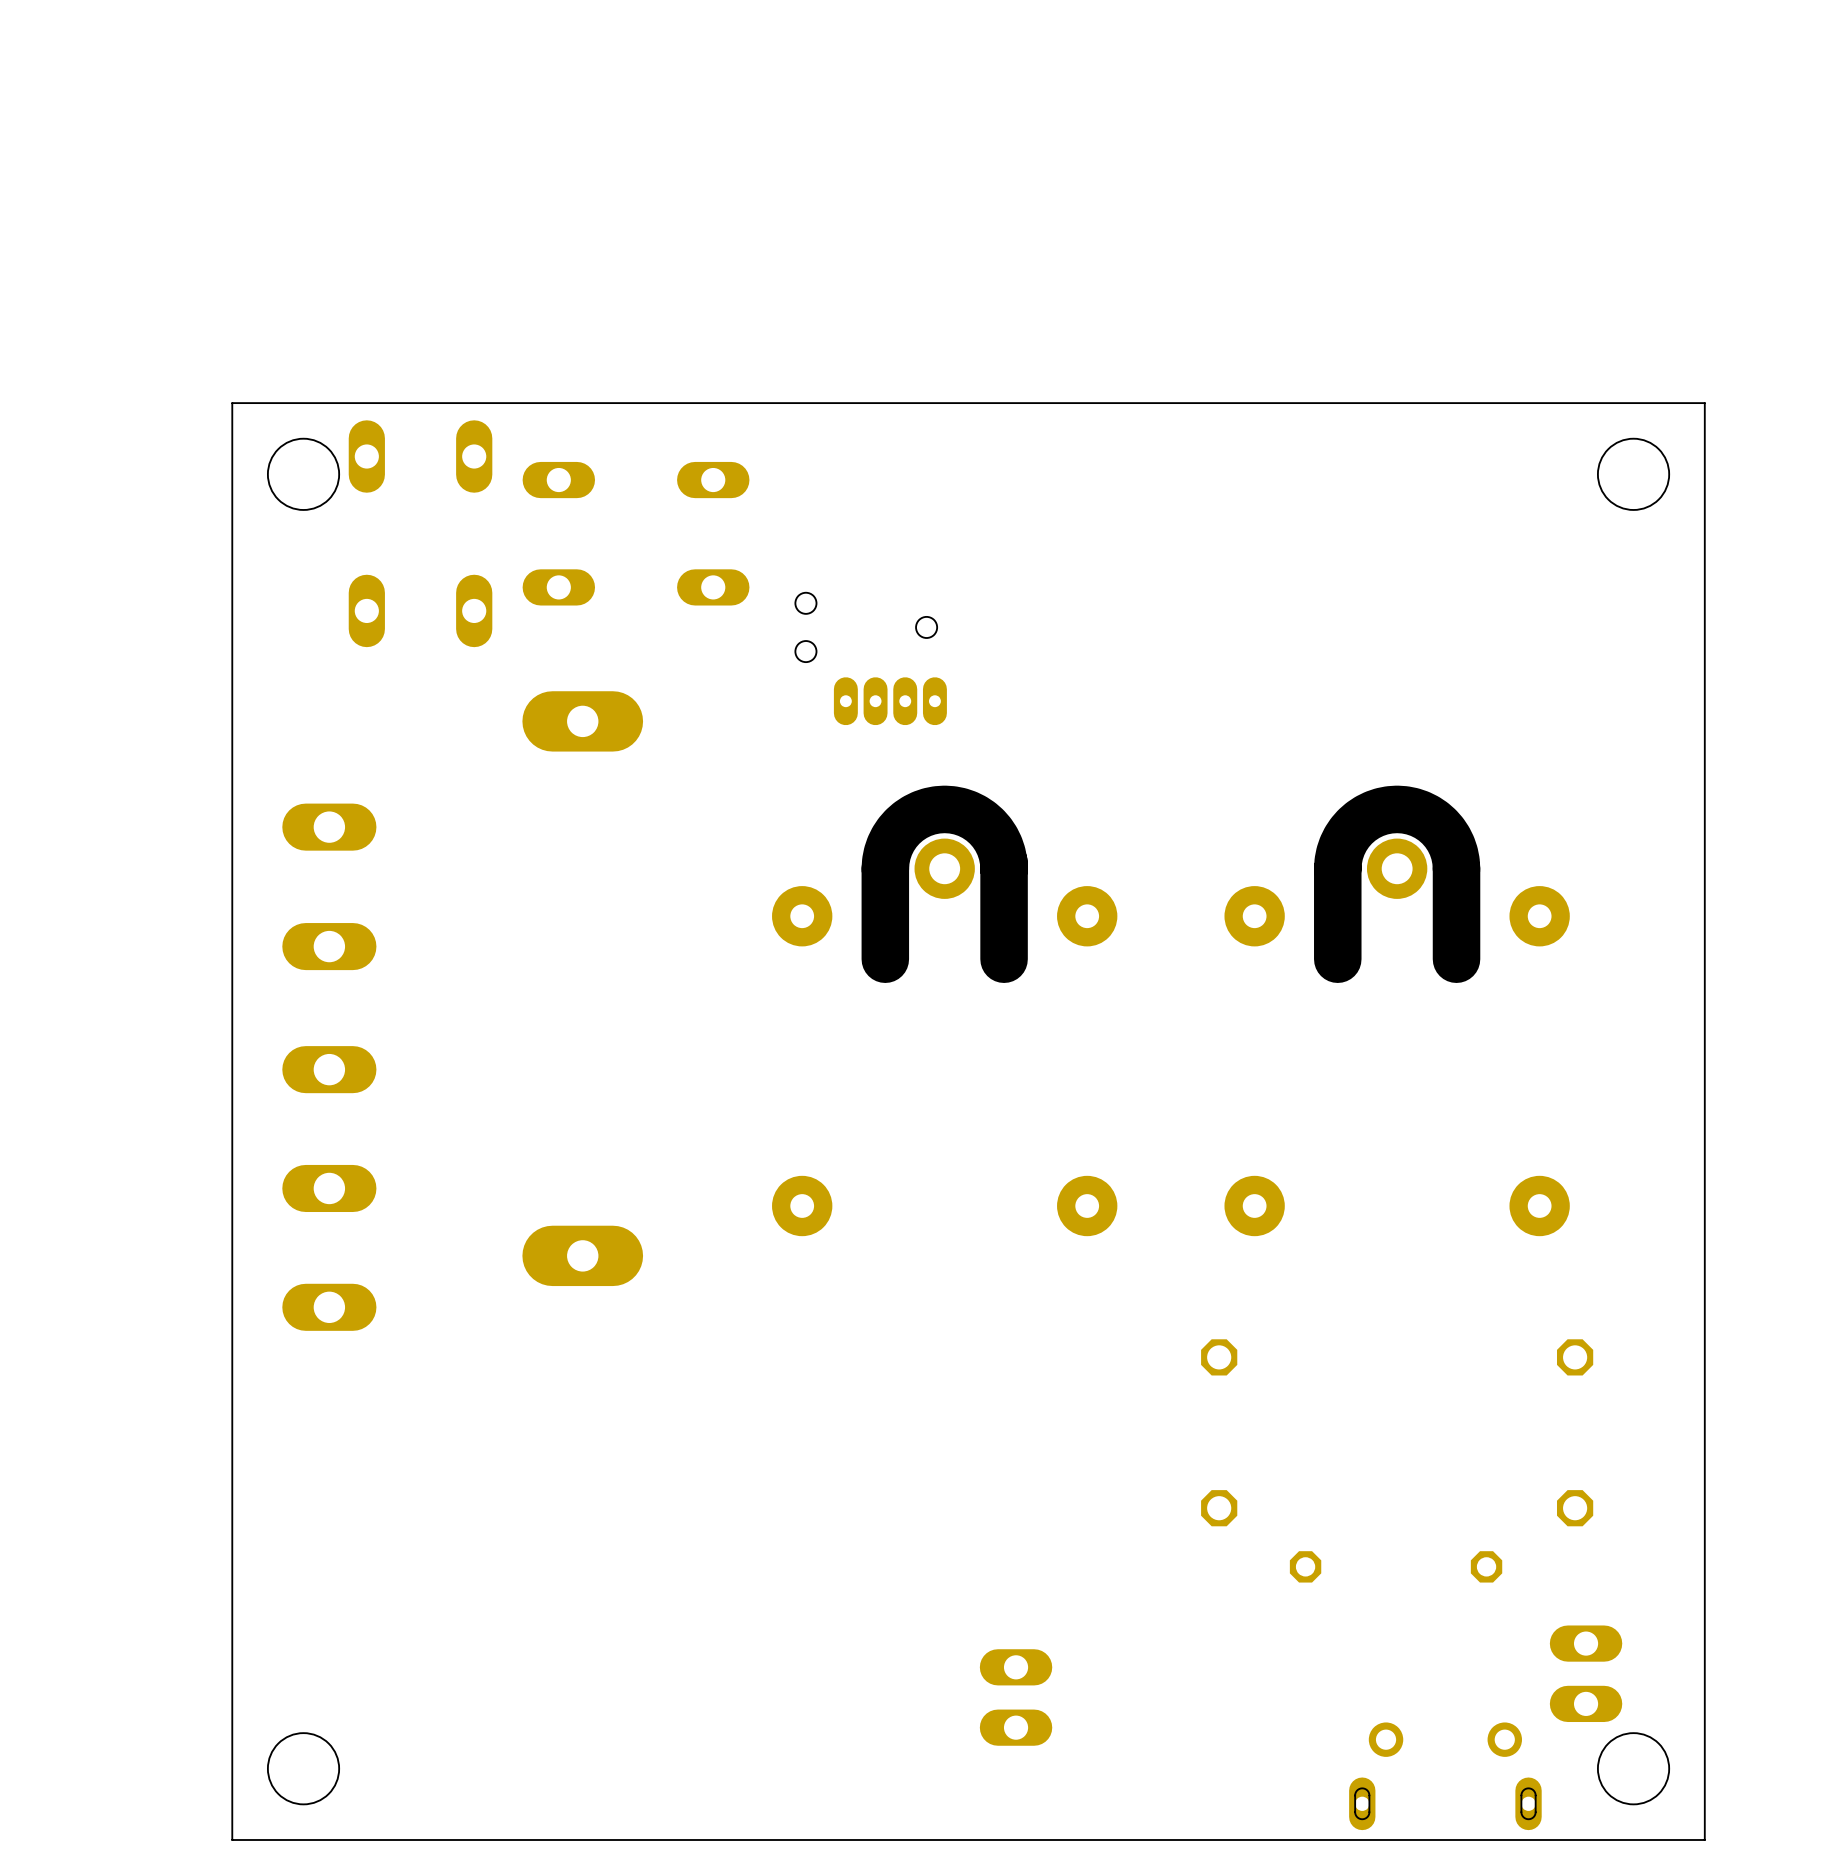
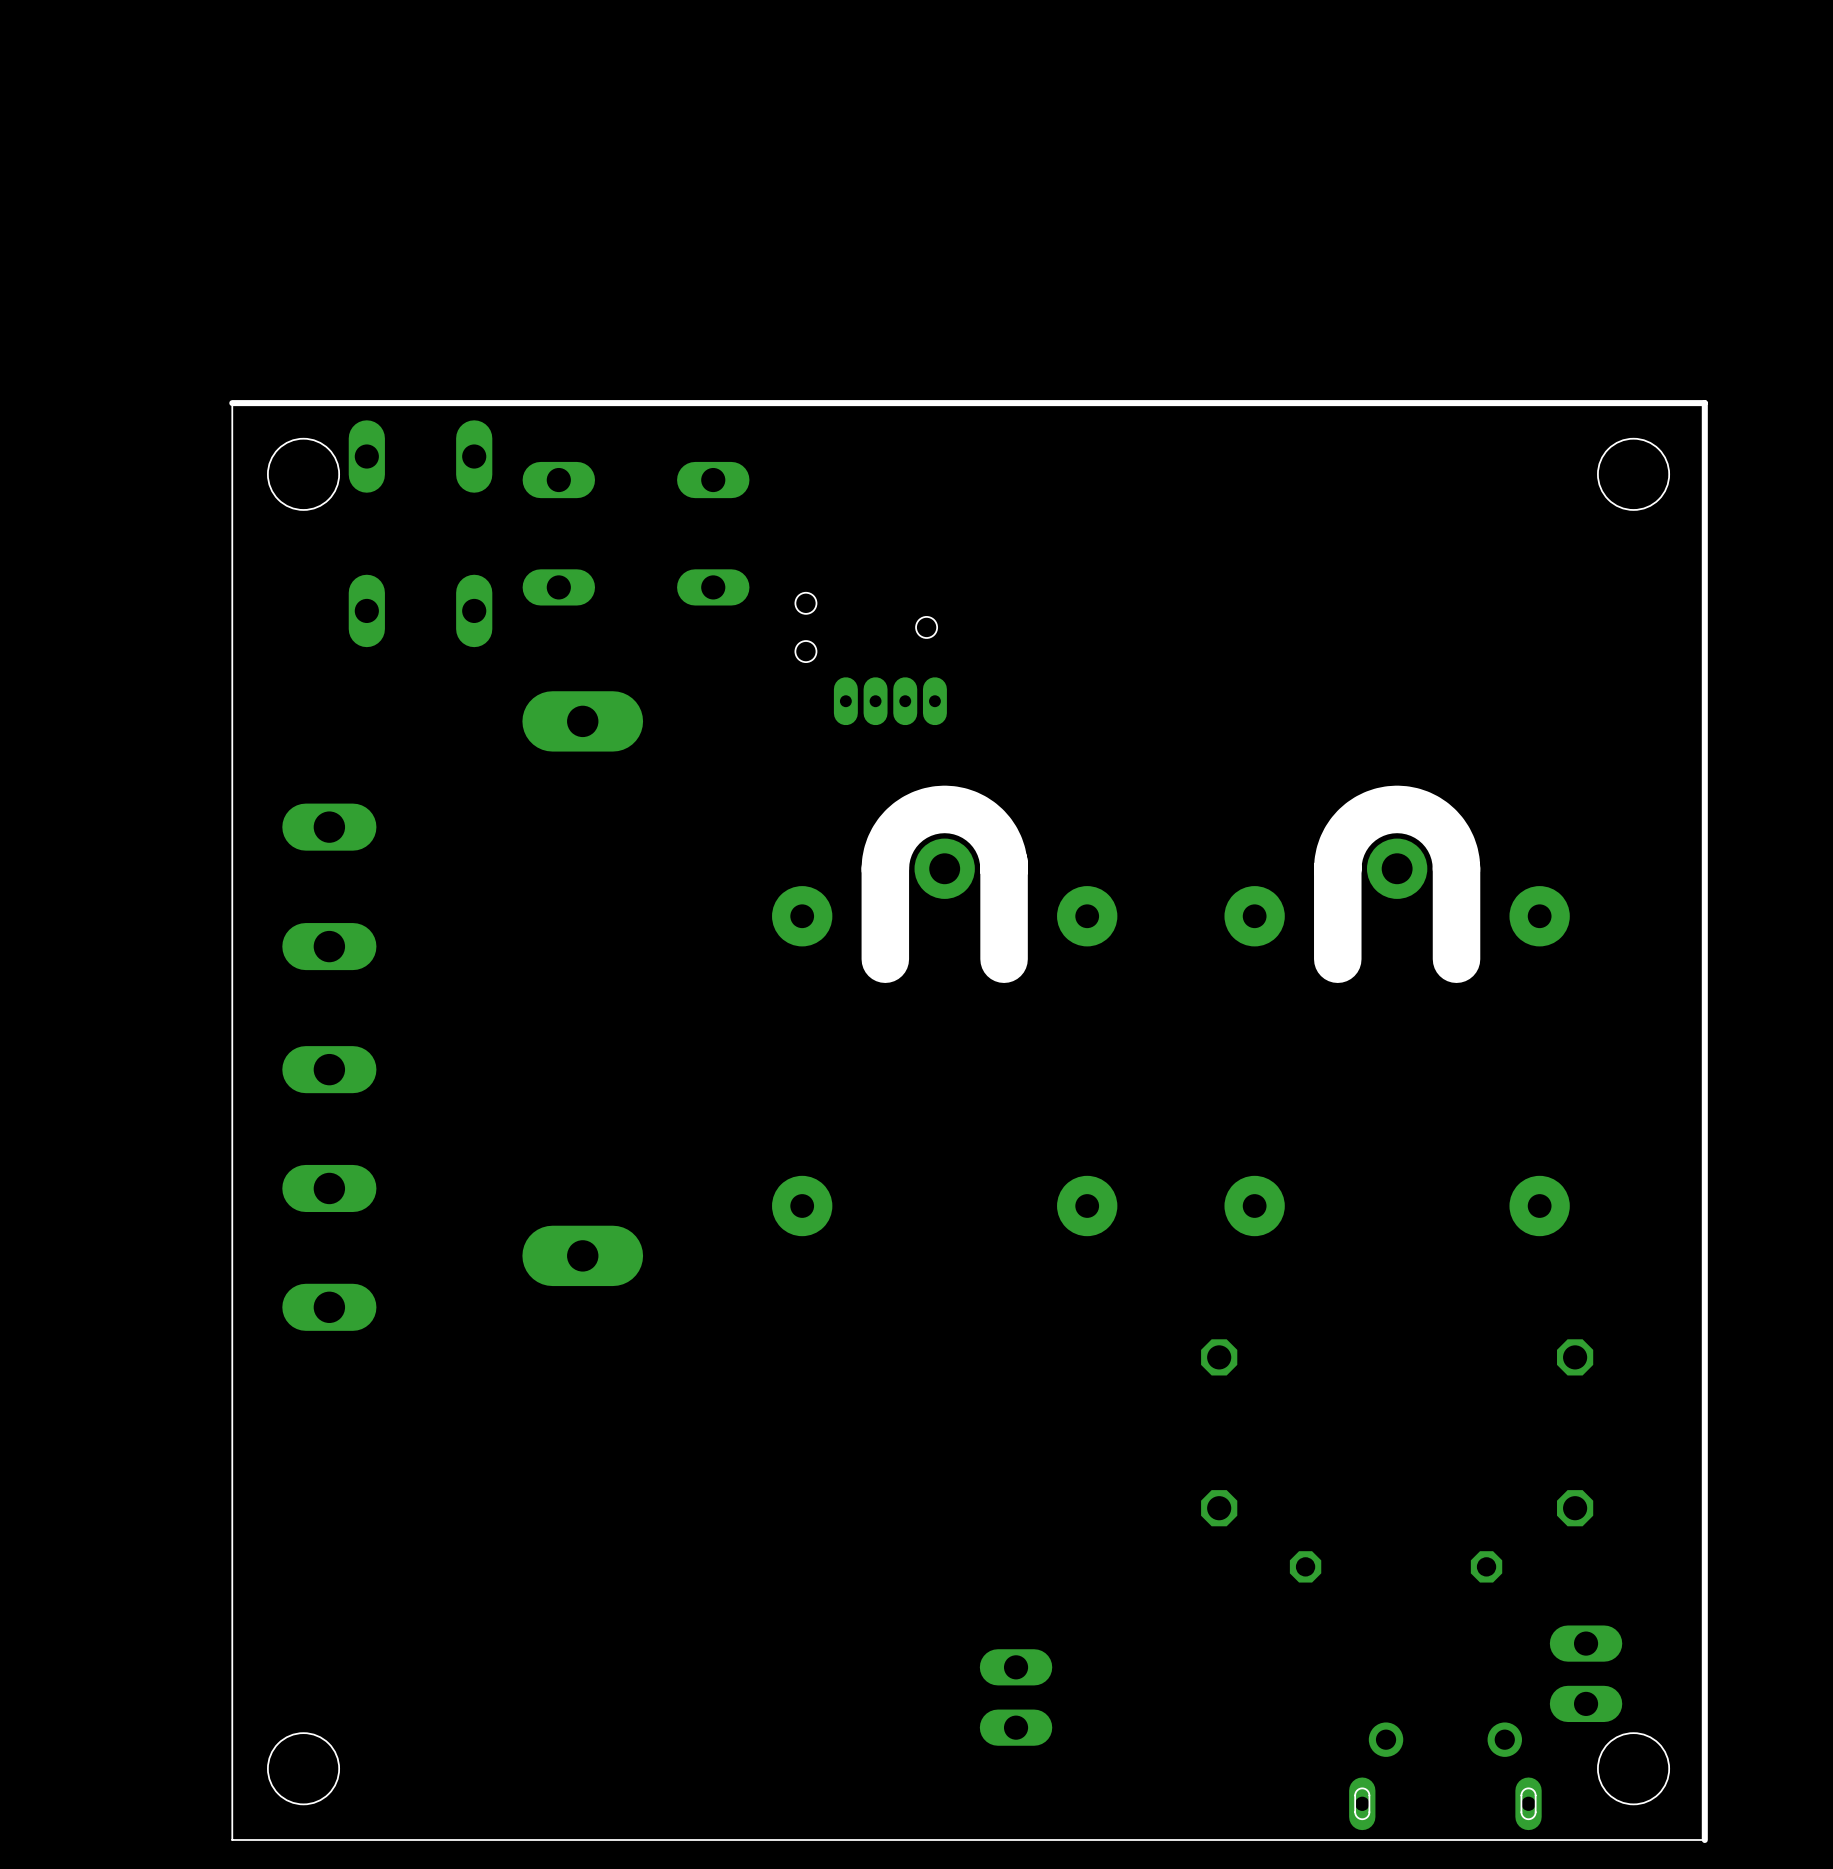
board edge width: thin (232, 403) (1704, 403) (1704, 1839) -> thick (232, 403) (1704, 403) (1704, 1839)

